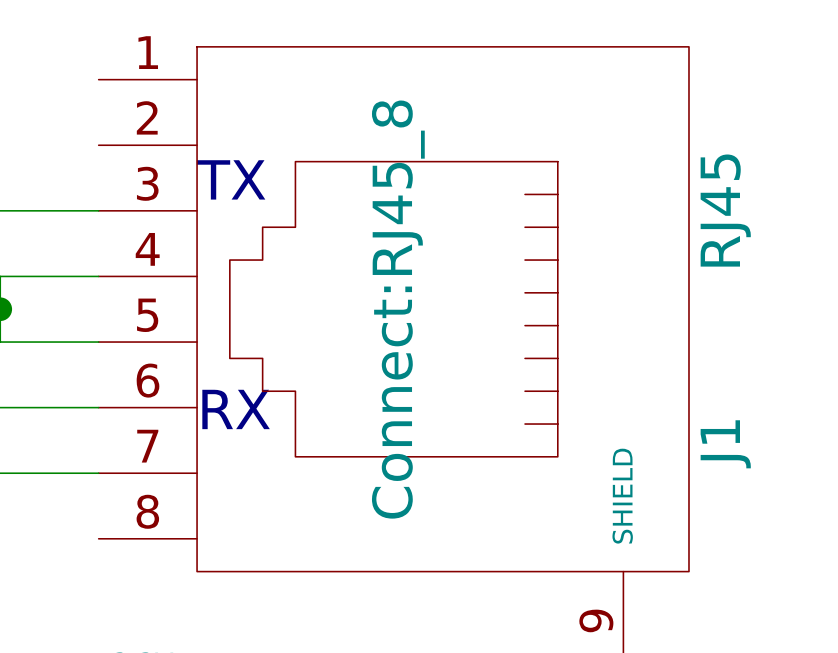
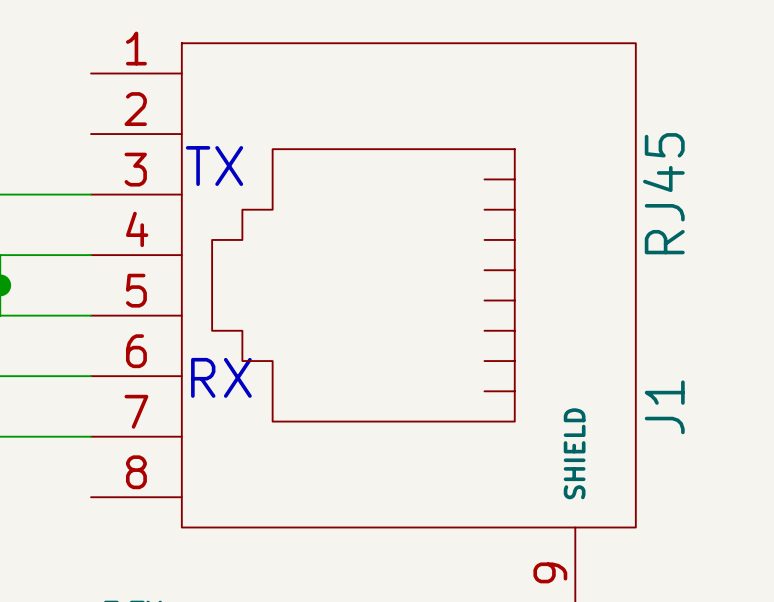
J1 text: Connect:RJ45_8 (398, 309) -> none

